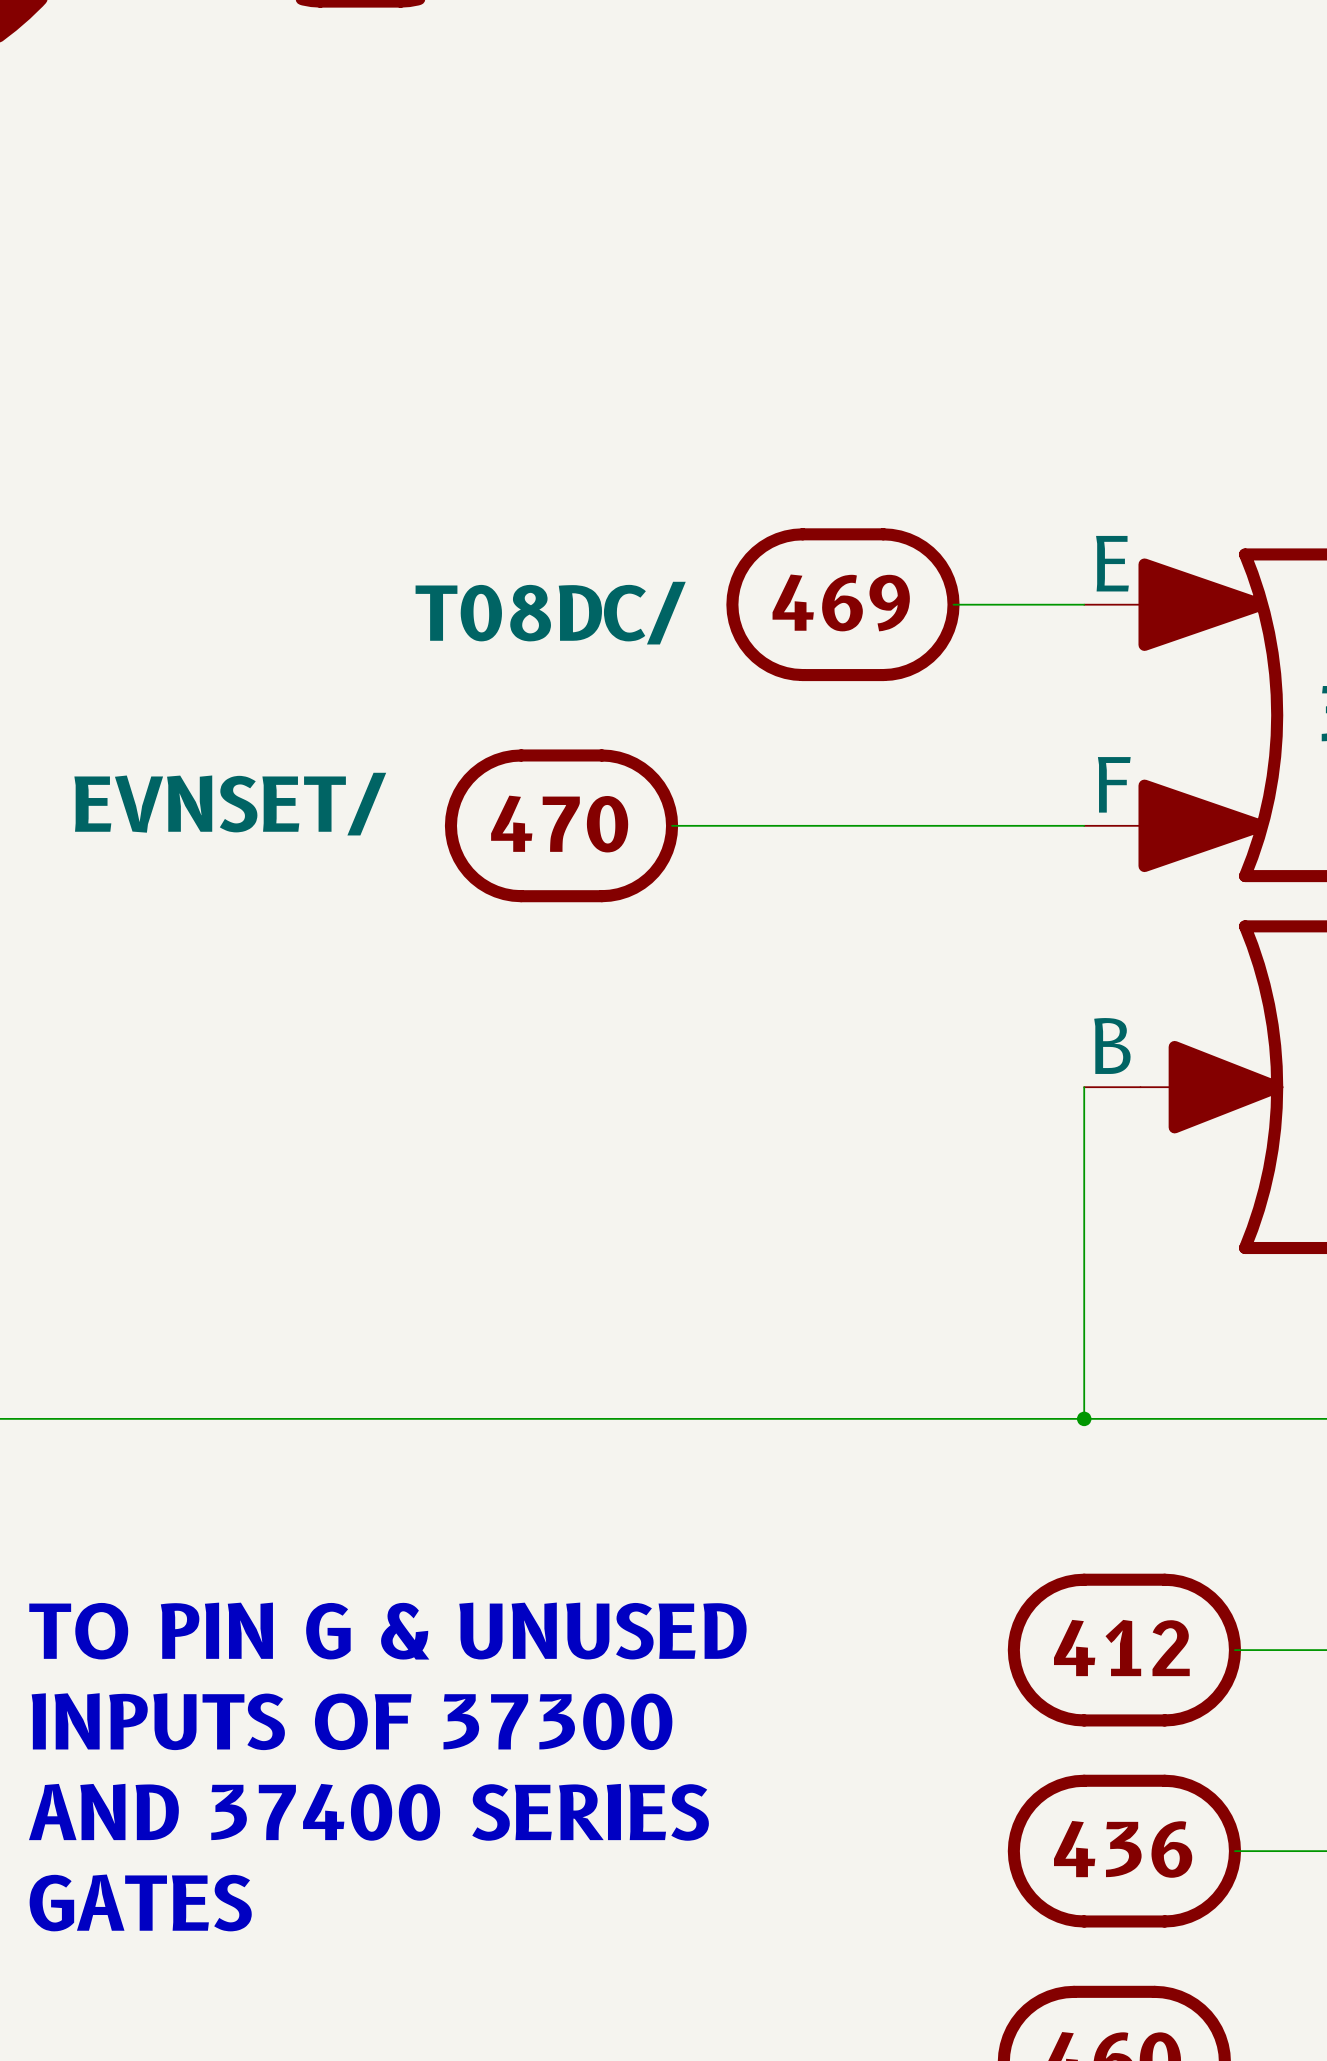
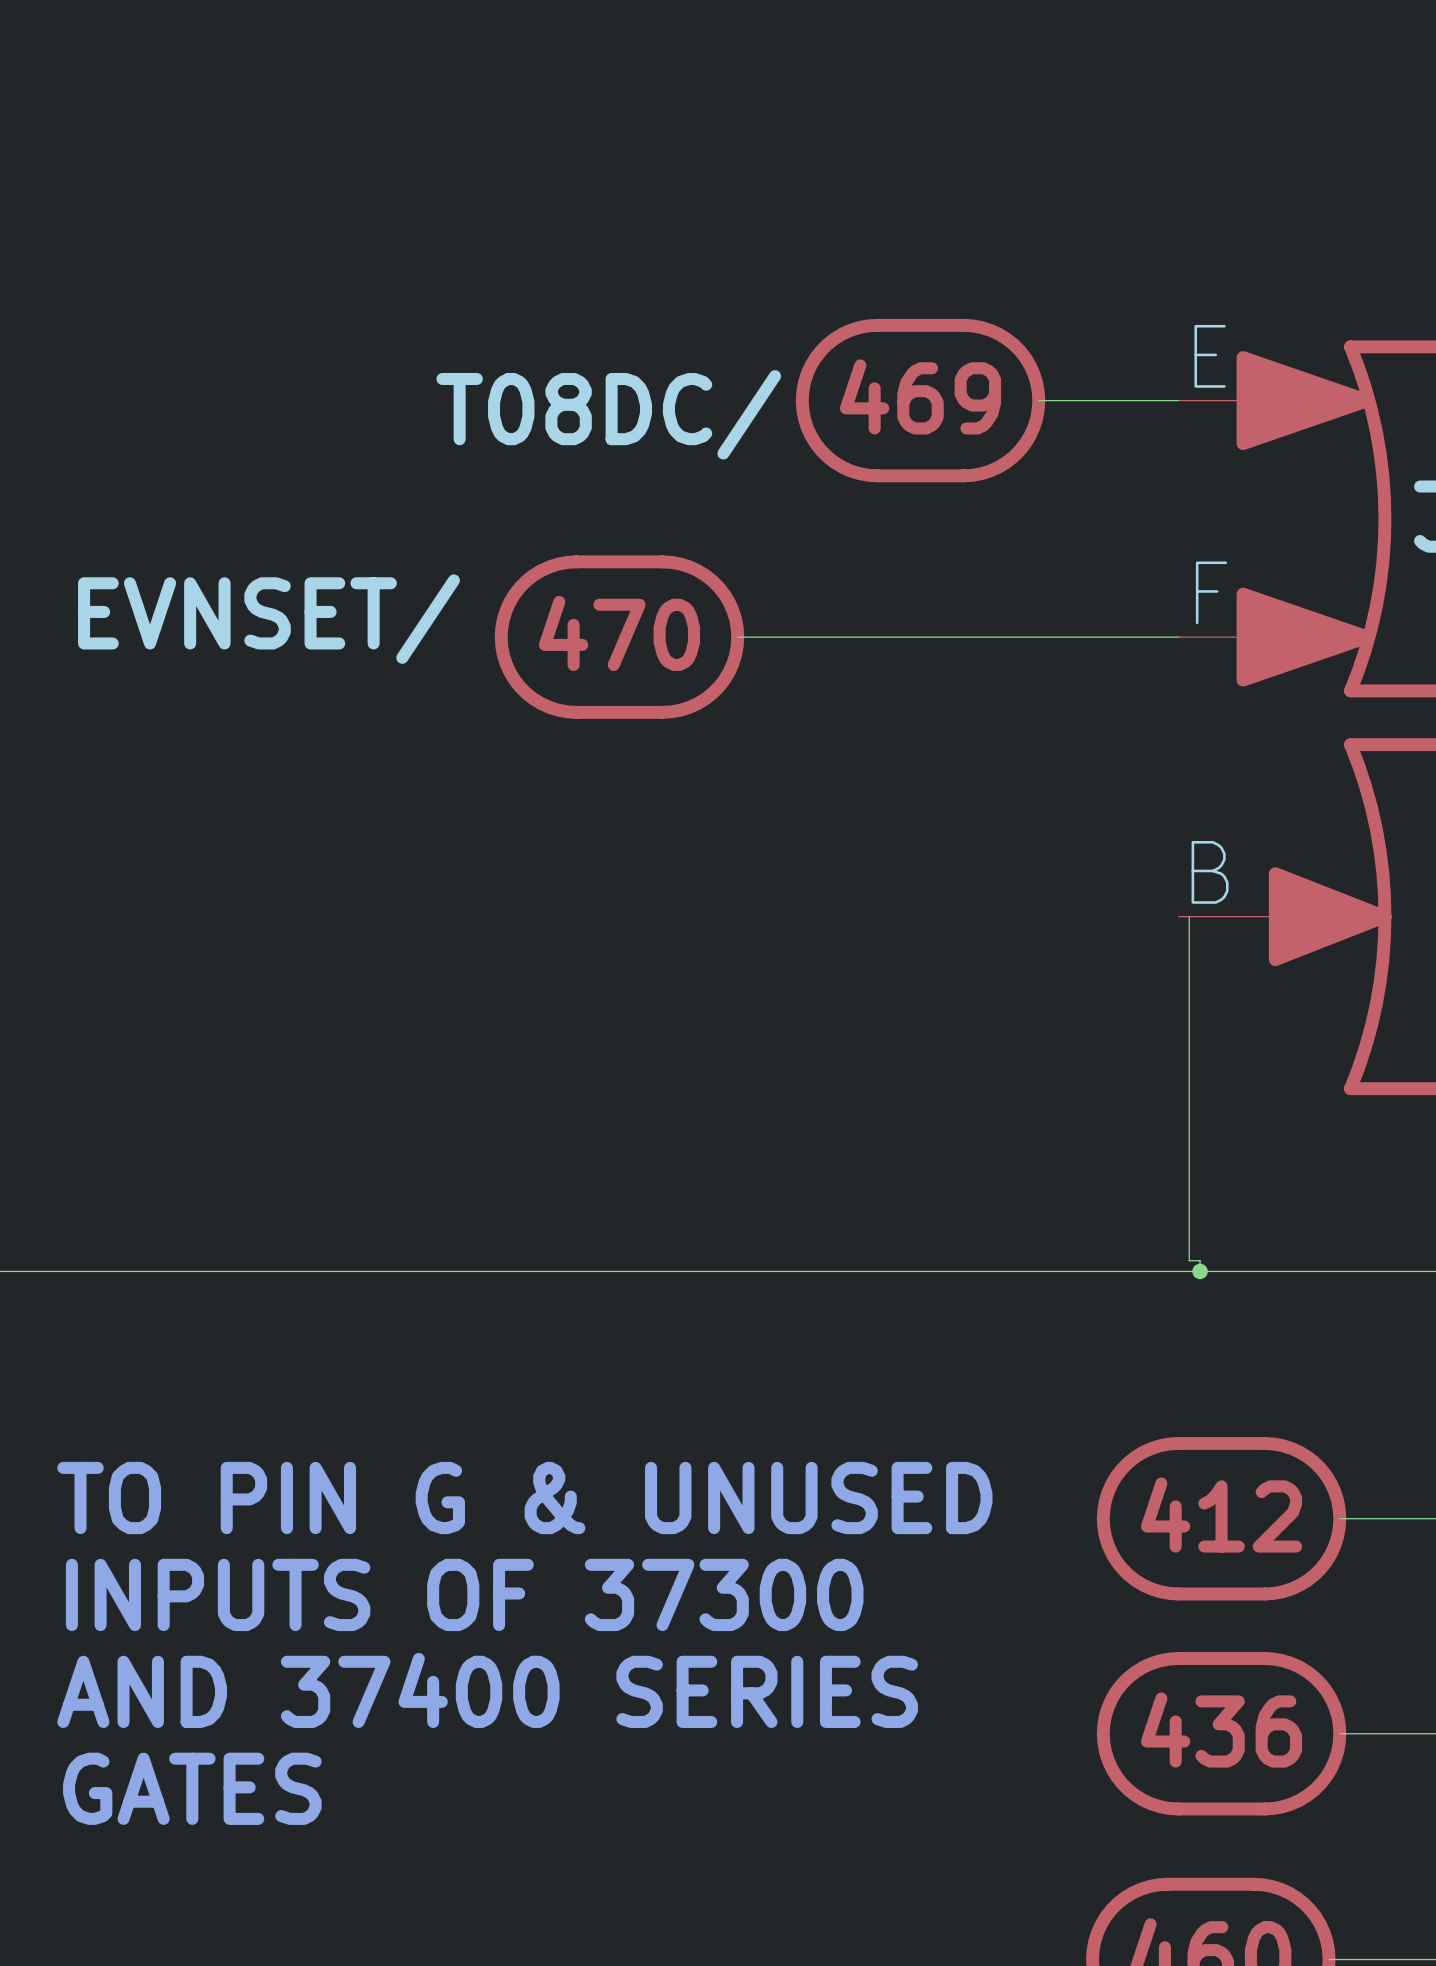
wire: (1084, 1087) (1084, 1418) -> none
wire: none -> (1189, 916) (1189, 1260) (1200, 1260) (1200, 1271)
junction position: (1084, 1418) -> (1200, 1271)

